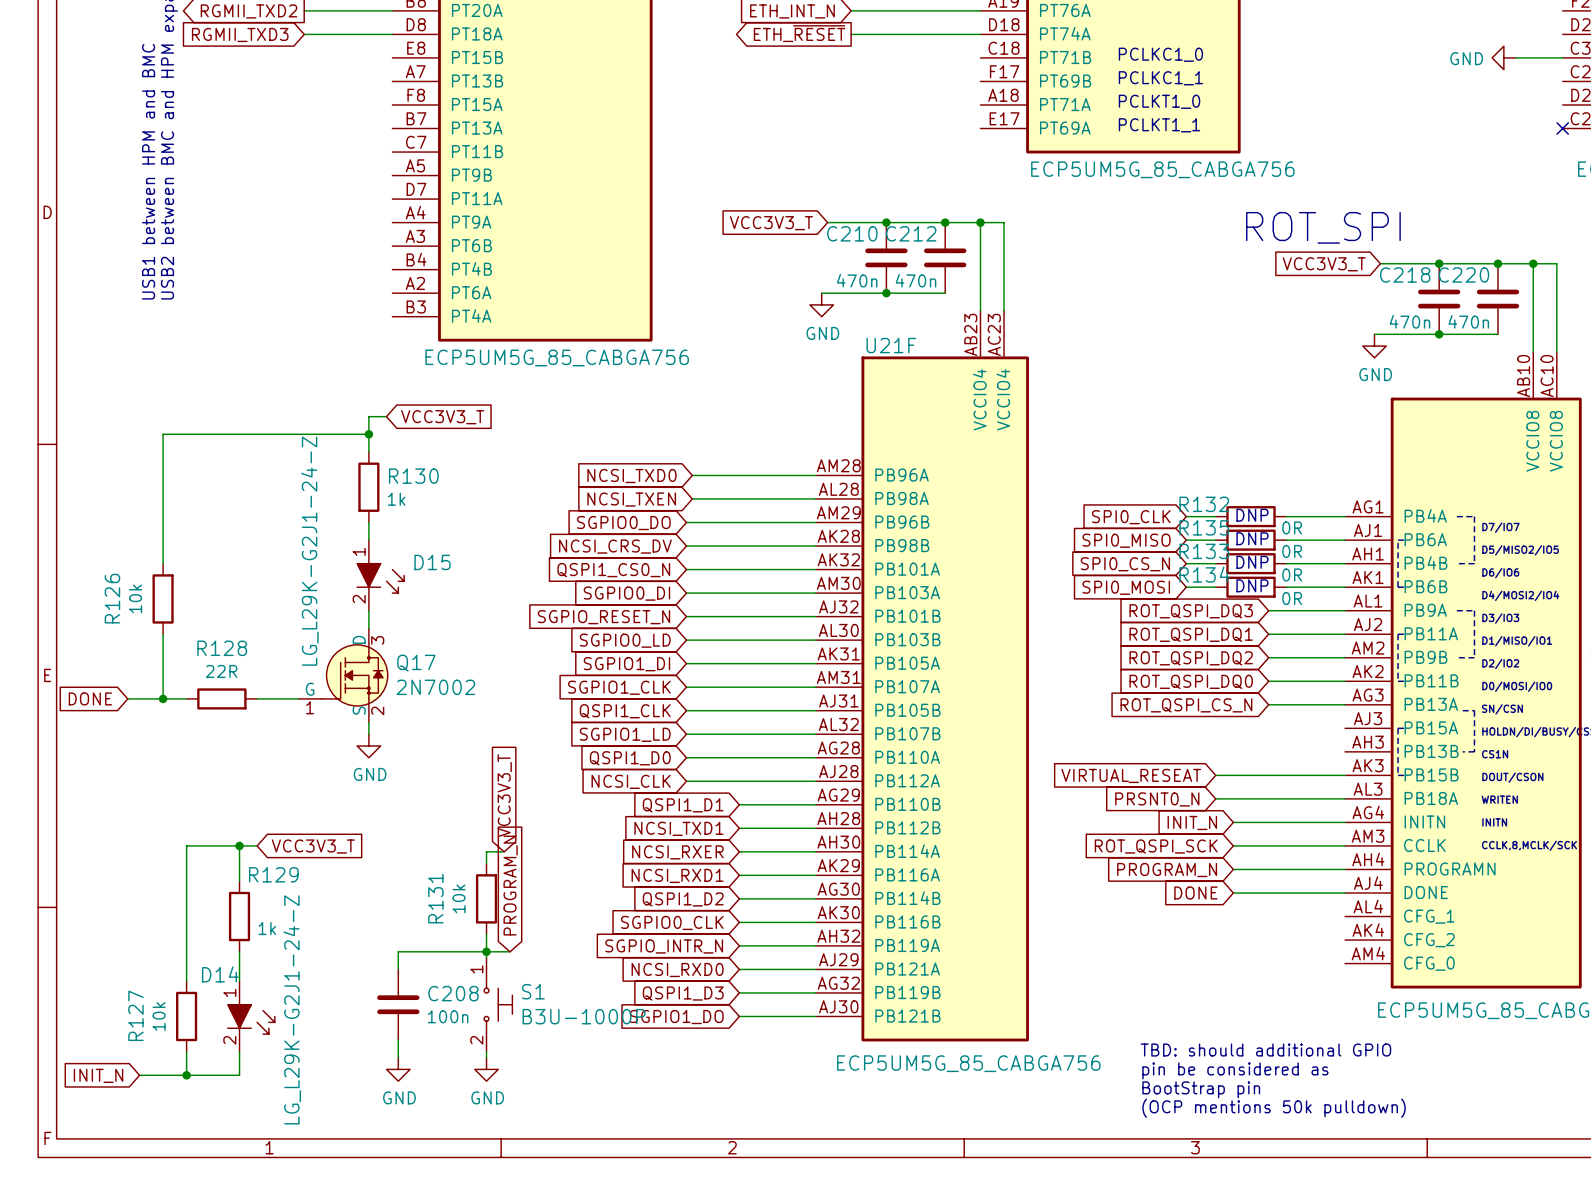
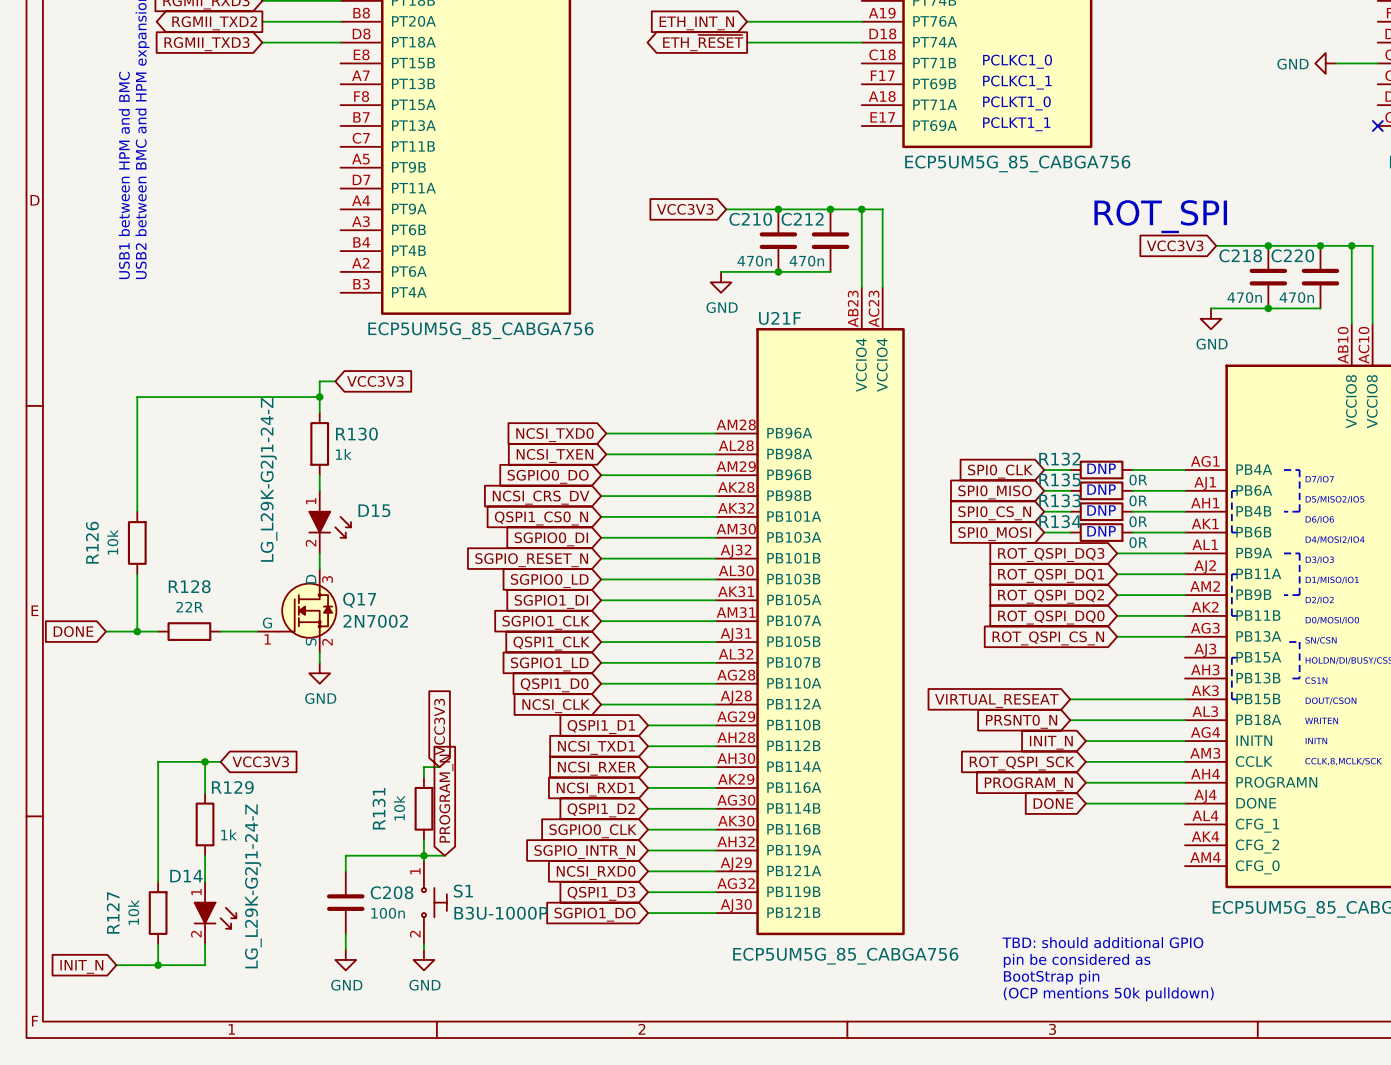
global label: VCC3V3_T (771, 223) -> VCC3V3 (685, 209)
global label: VCC3V3_T (1324, 264) -> VCC3V3 (1175, 245)
global label: VCC3V3_T (442, 417) -> VCC3V3 (375, 381)
global label: VCC3V3_T (504, 795) -> VCC3V3 (439, 727)
global label: VCC3V3_T (313, 846) -> VCC3V3 (260, 761)

